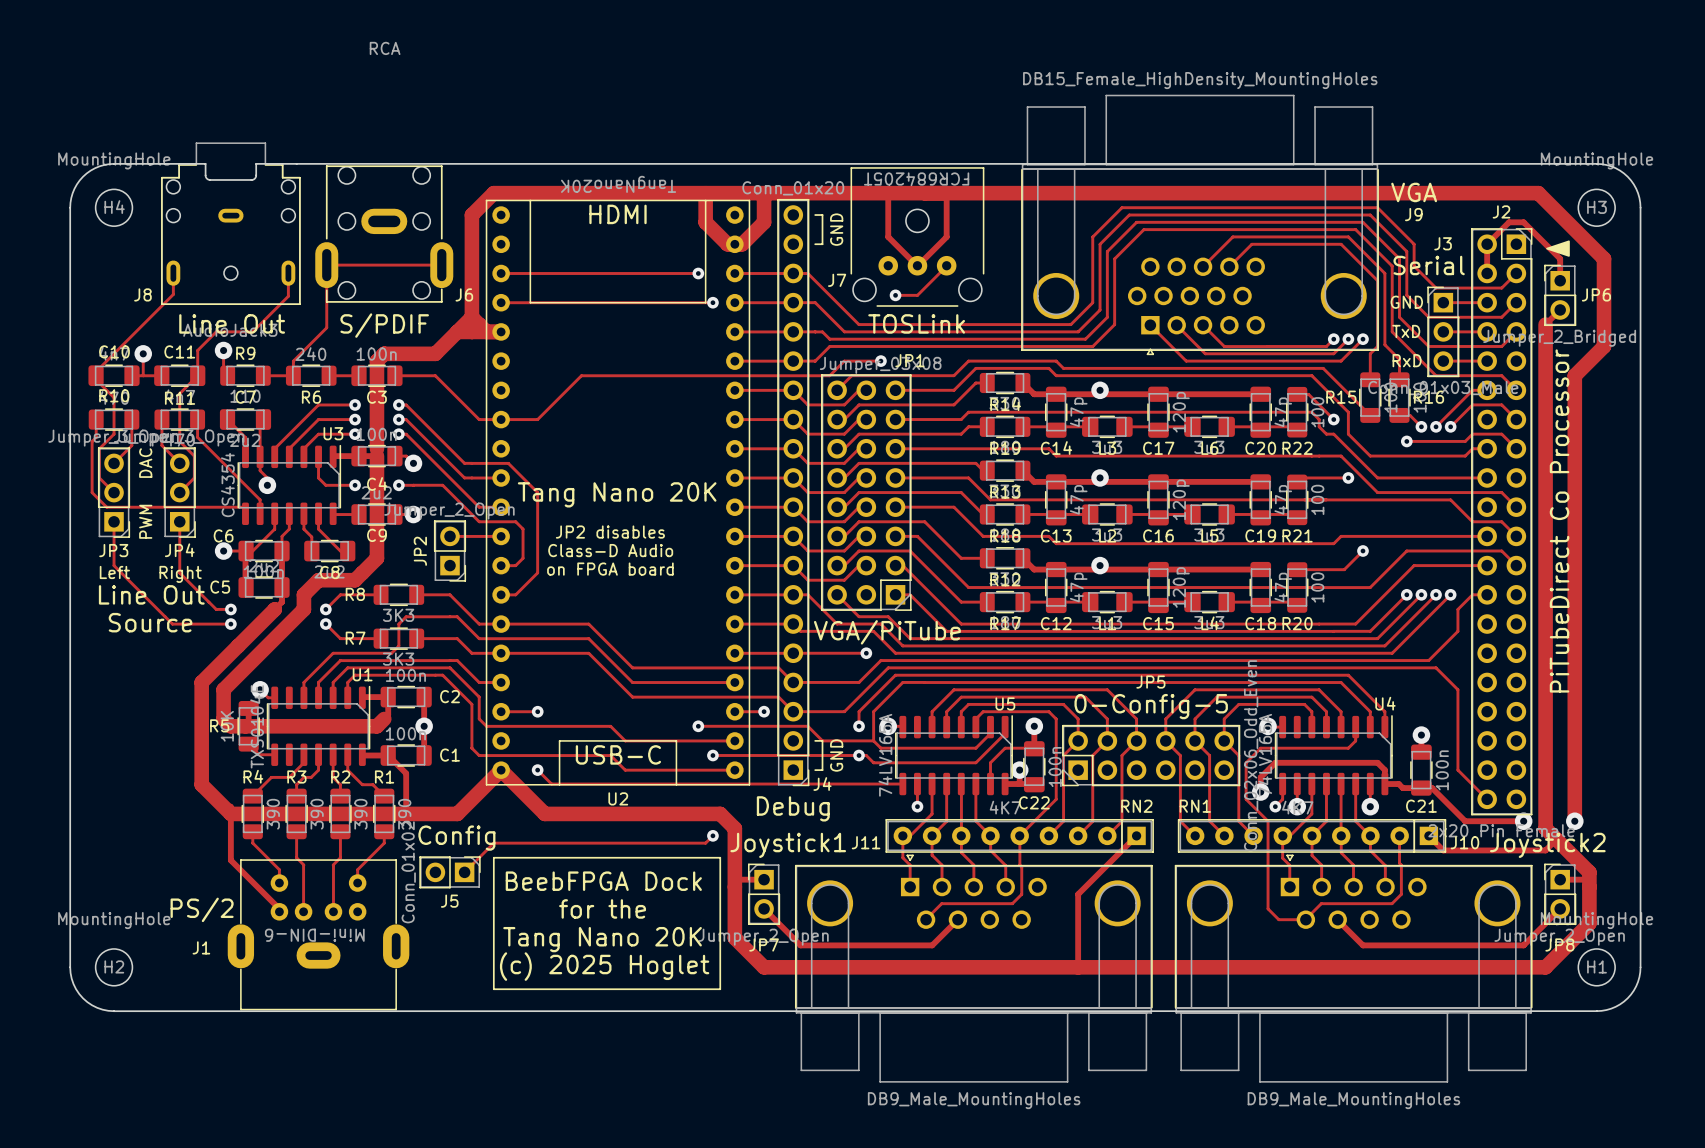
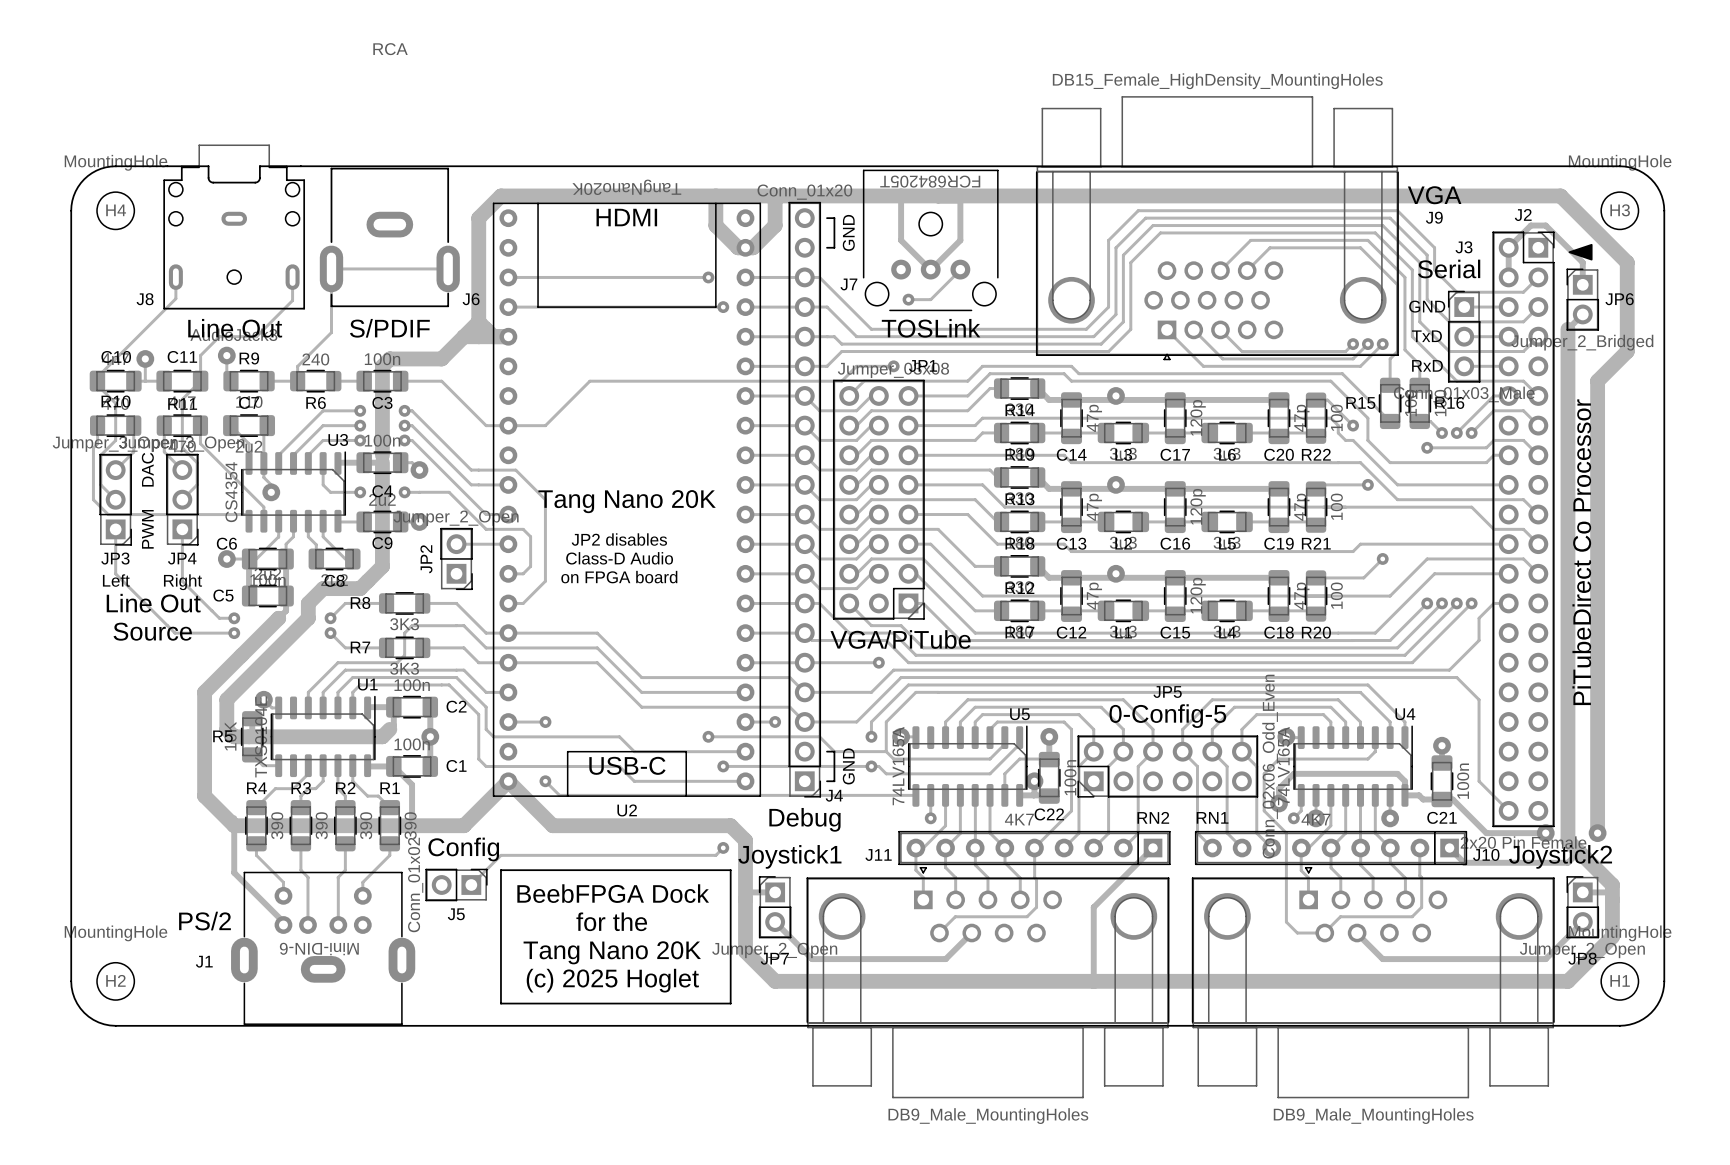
J6 footprint: [315, 165, 454, 303] -> [319, 167, 460, 308]

